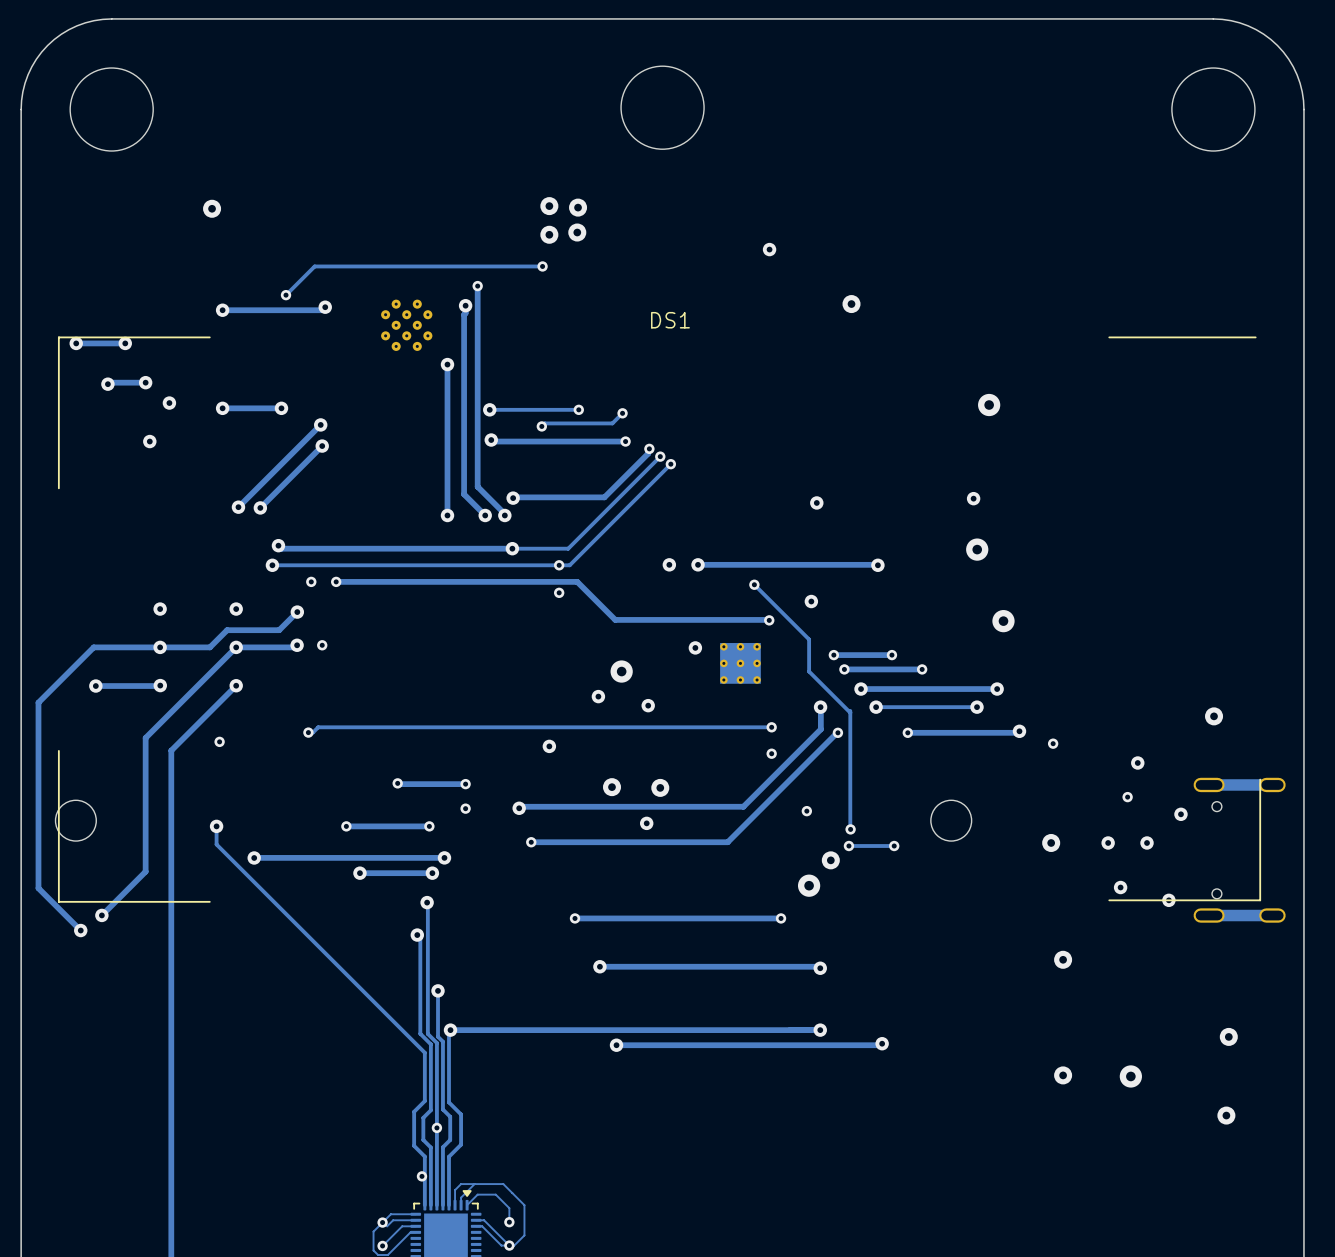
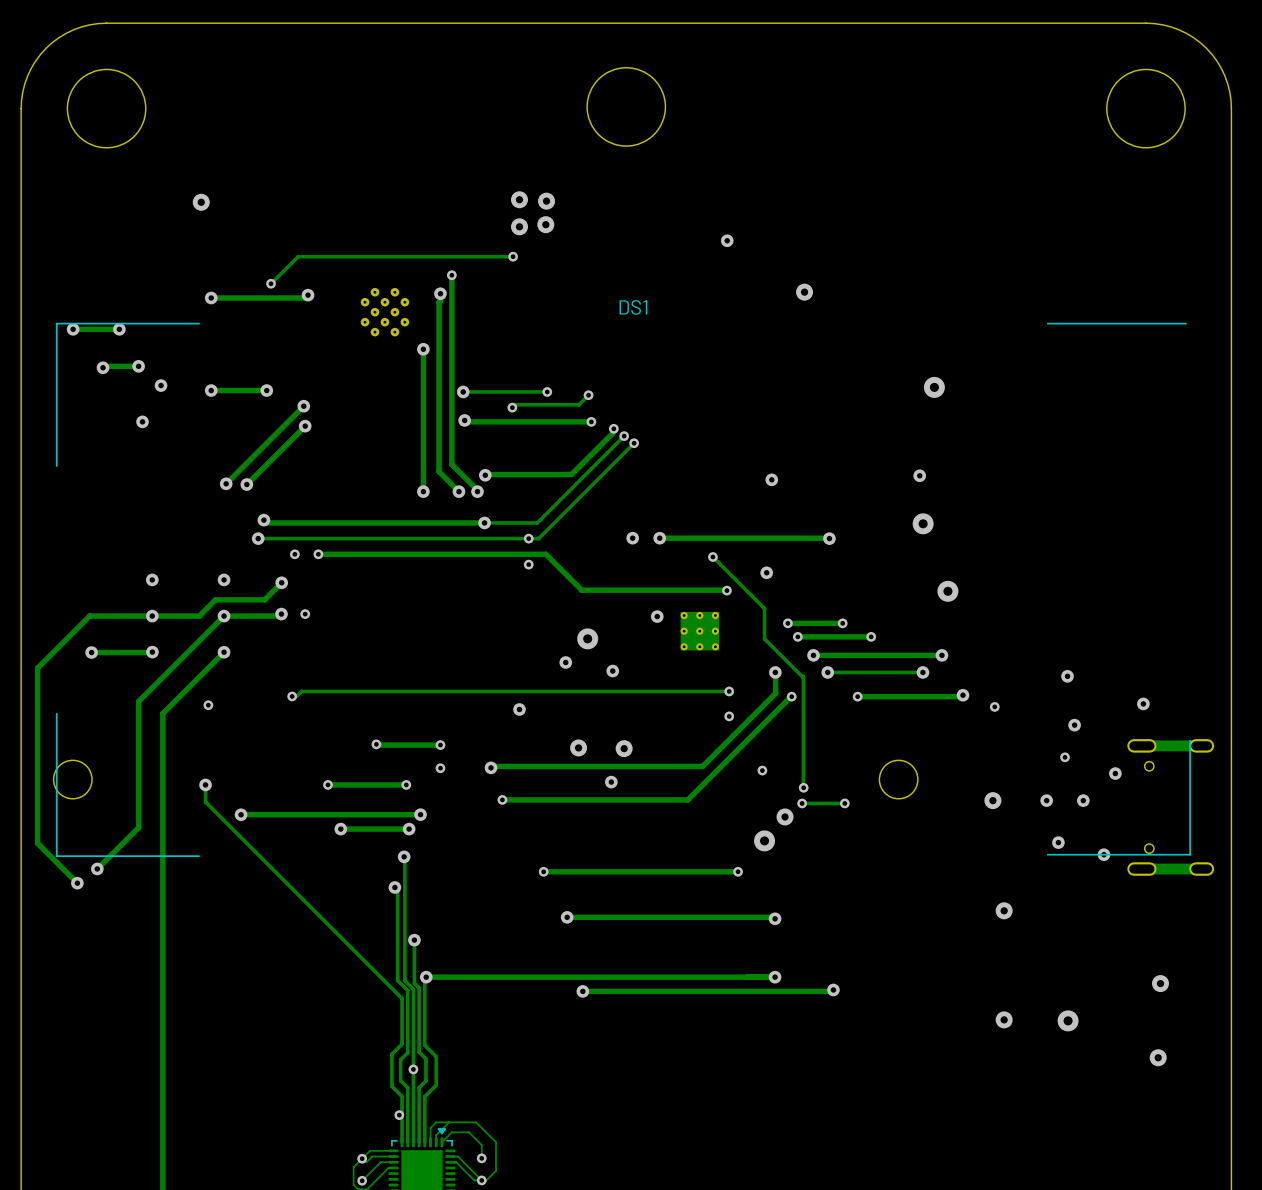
via: none -> (1067, 676)
via: (1214, 716) -> none
via: none -> (1143, 703)

